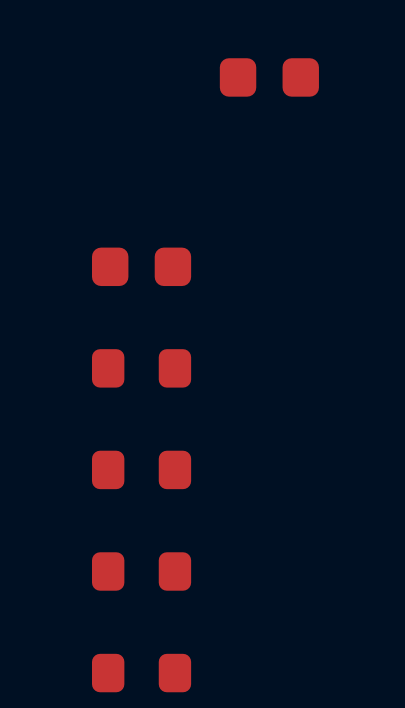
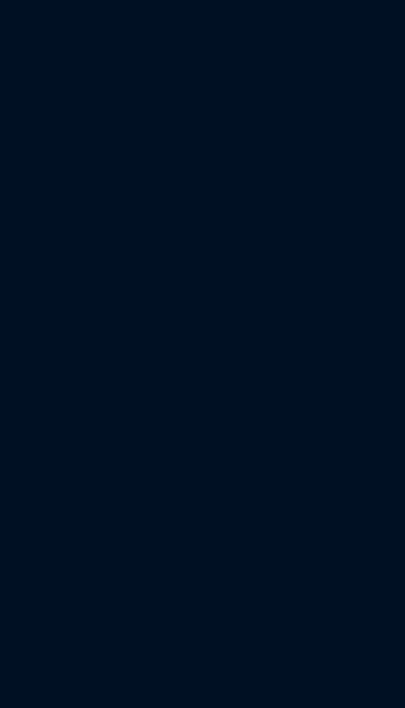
part: (269, 77) -> none
part: (141, 266) -> none
part: (141, 368) -> none
part: (141, 469) -> none
part: (141, 571) -> none
part: (141, 673) -> none

